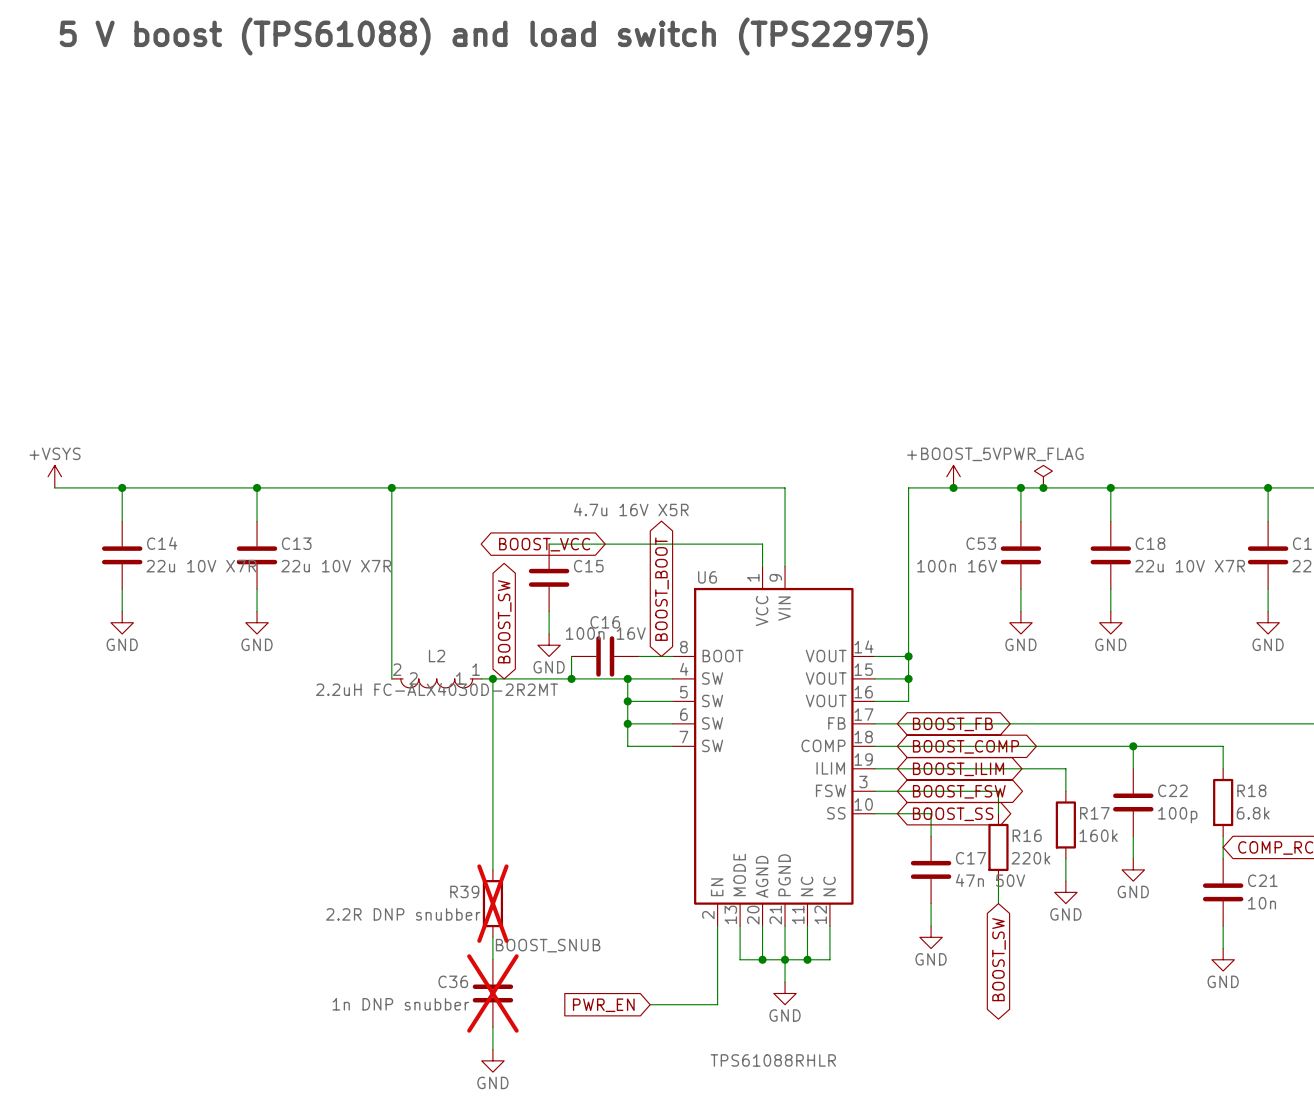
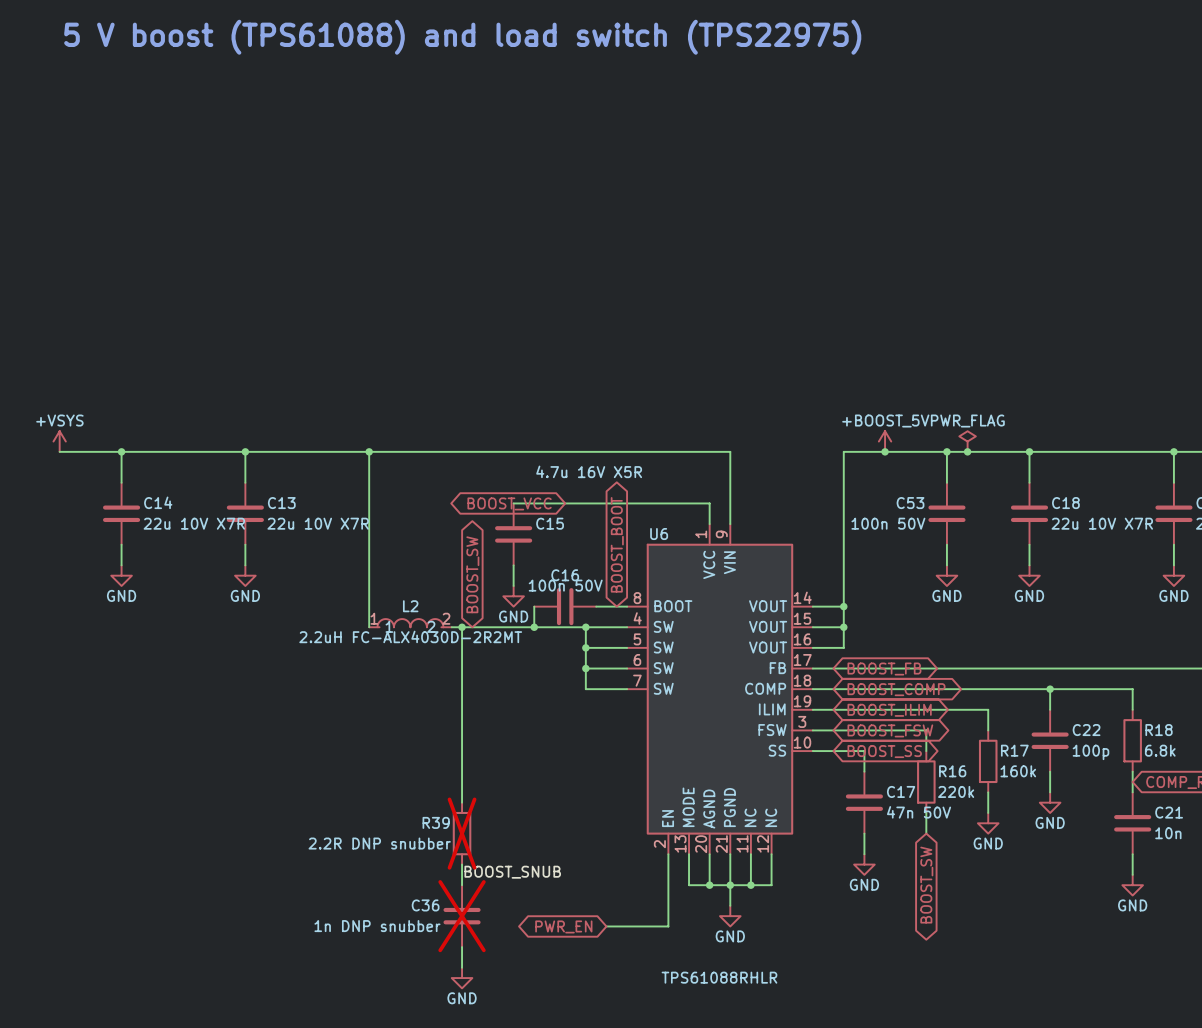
C53 value: 100n 16V (957, 566) -> 100n 50V (888, 523)
C16 value: 100n 16V (605, 633) -> 100n 50V (565, 585)
L2 rotation: 0° (436, 683) -> 180° (410, 623)
global label shape: input (603, 1005) -> bidirectional (563, 926)

